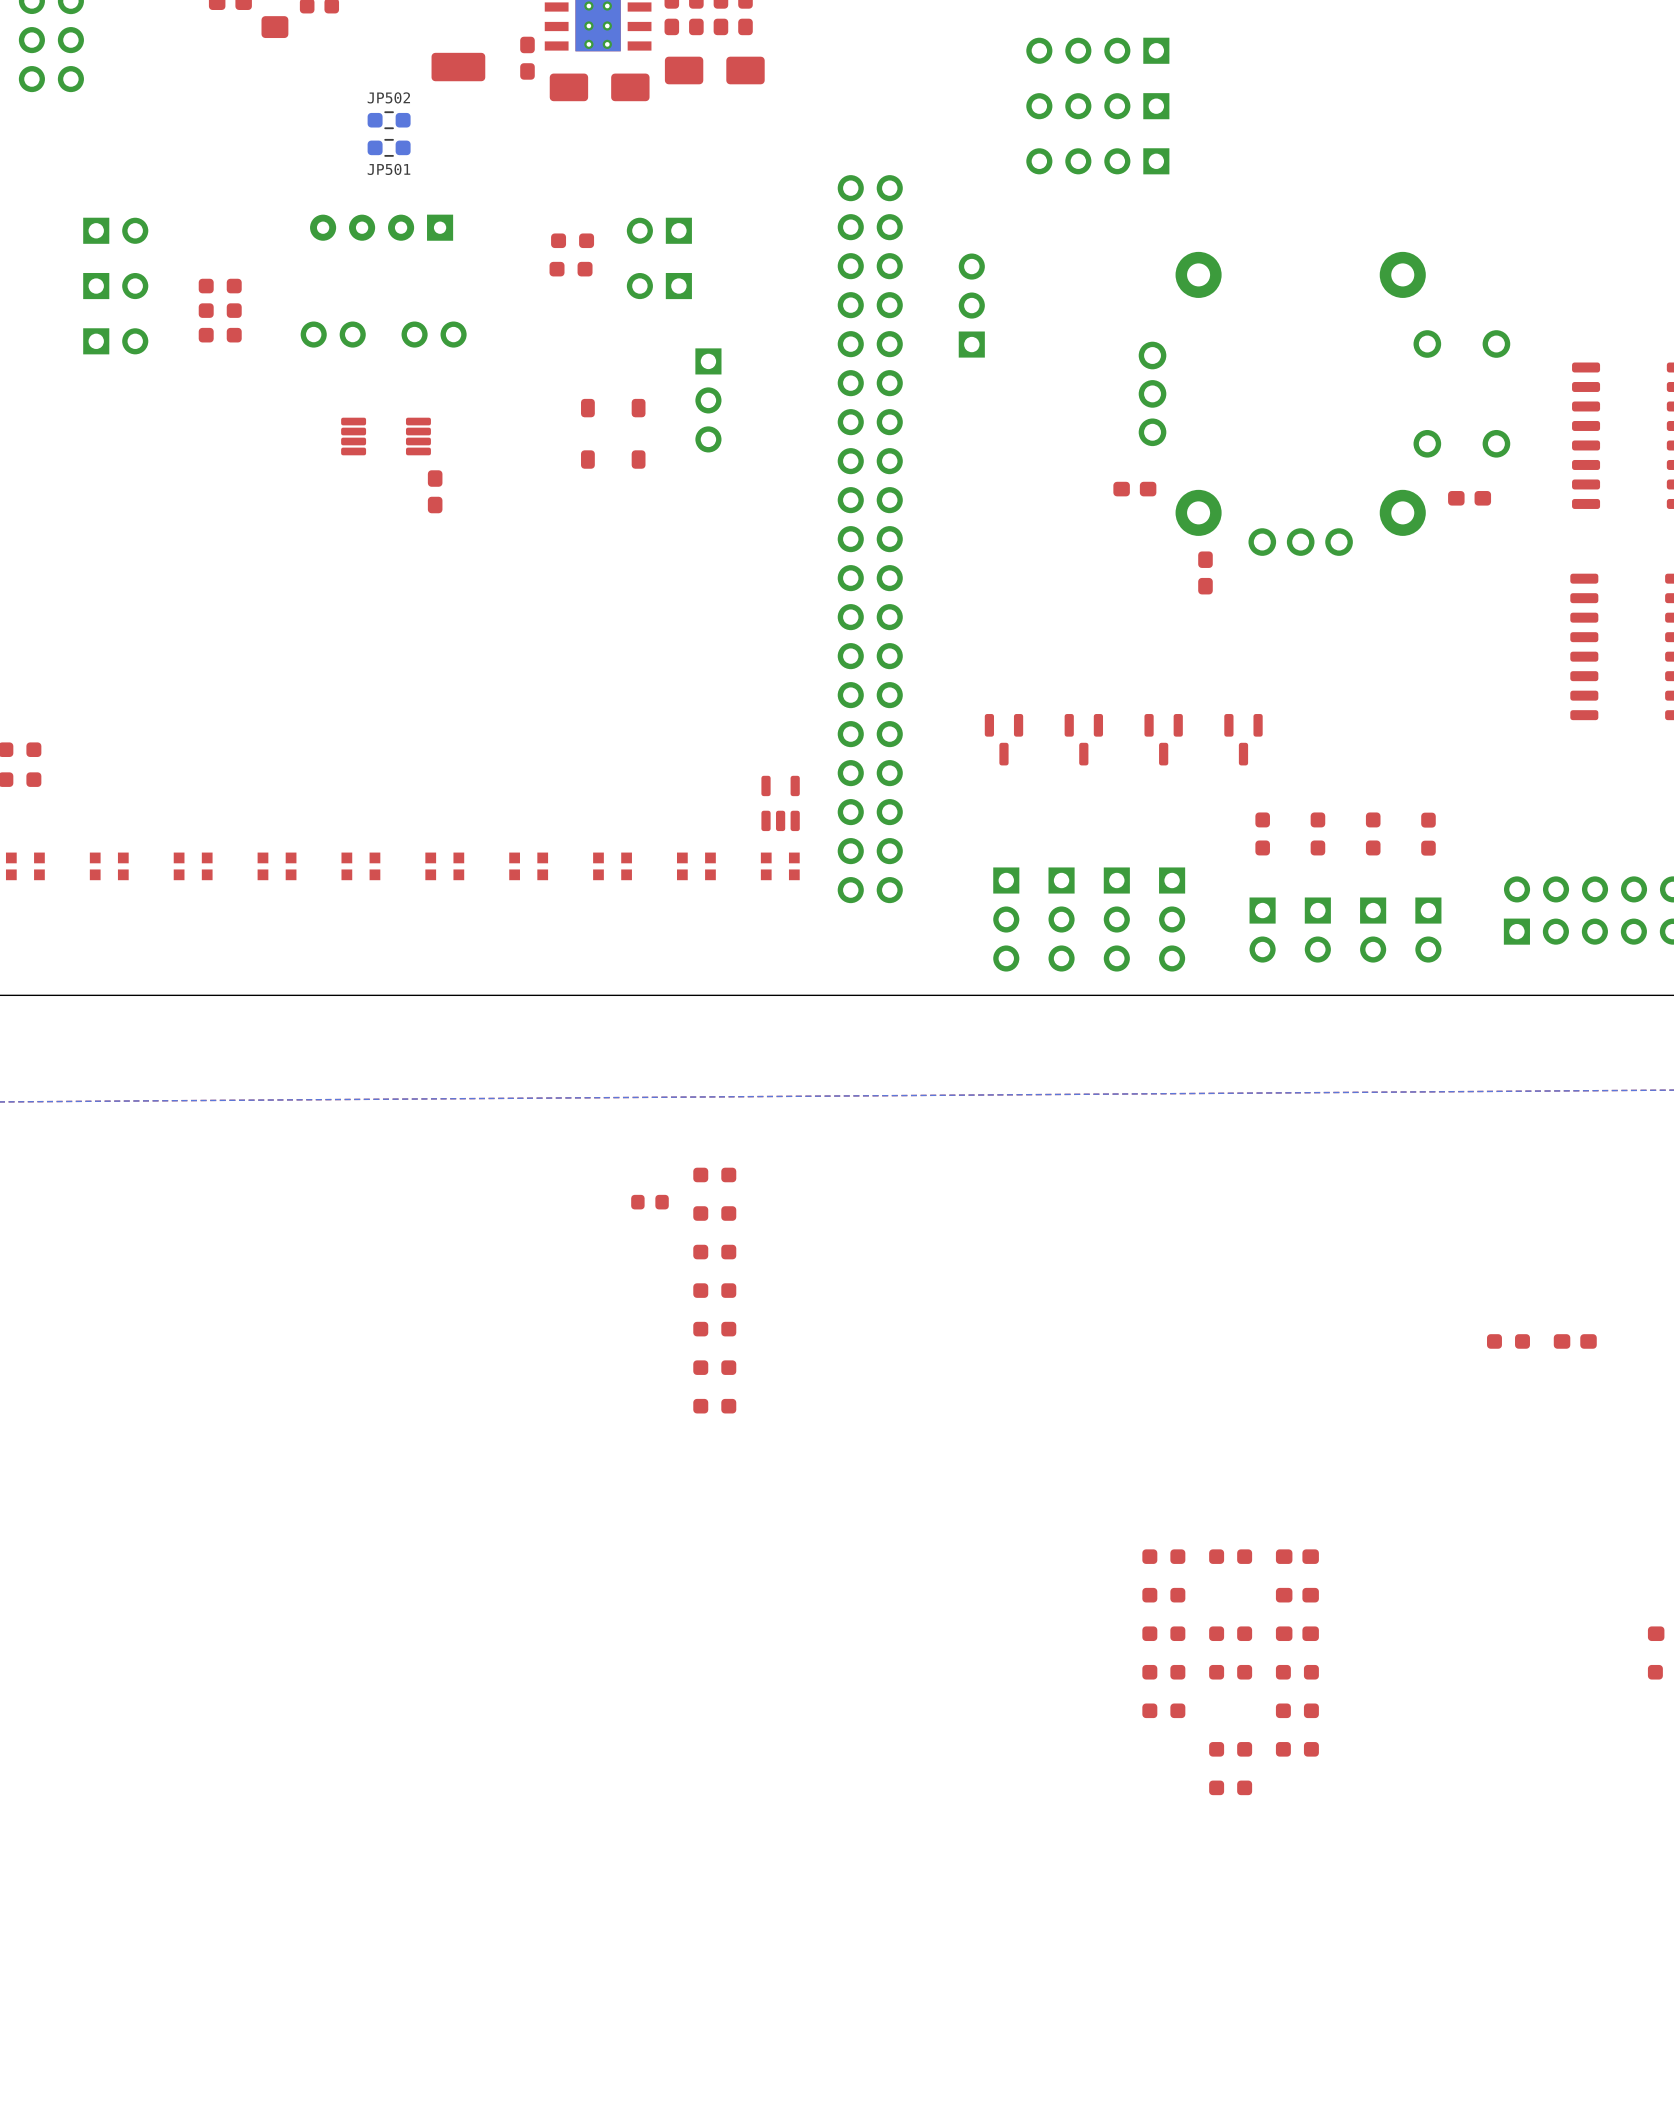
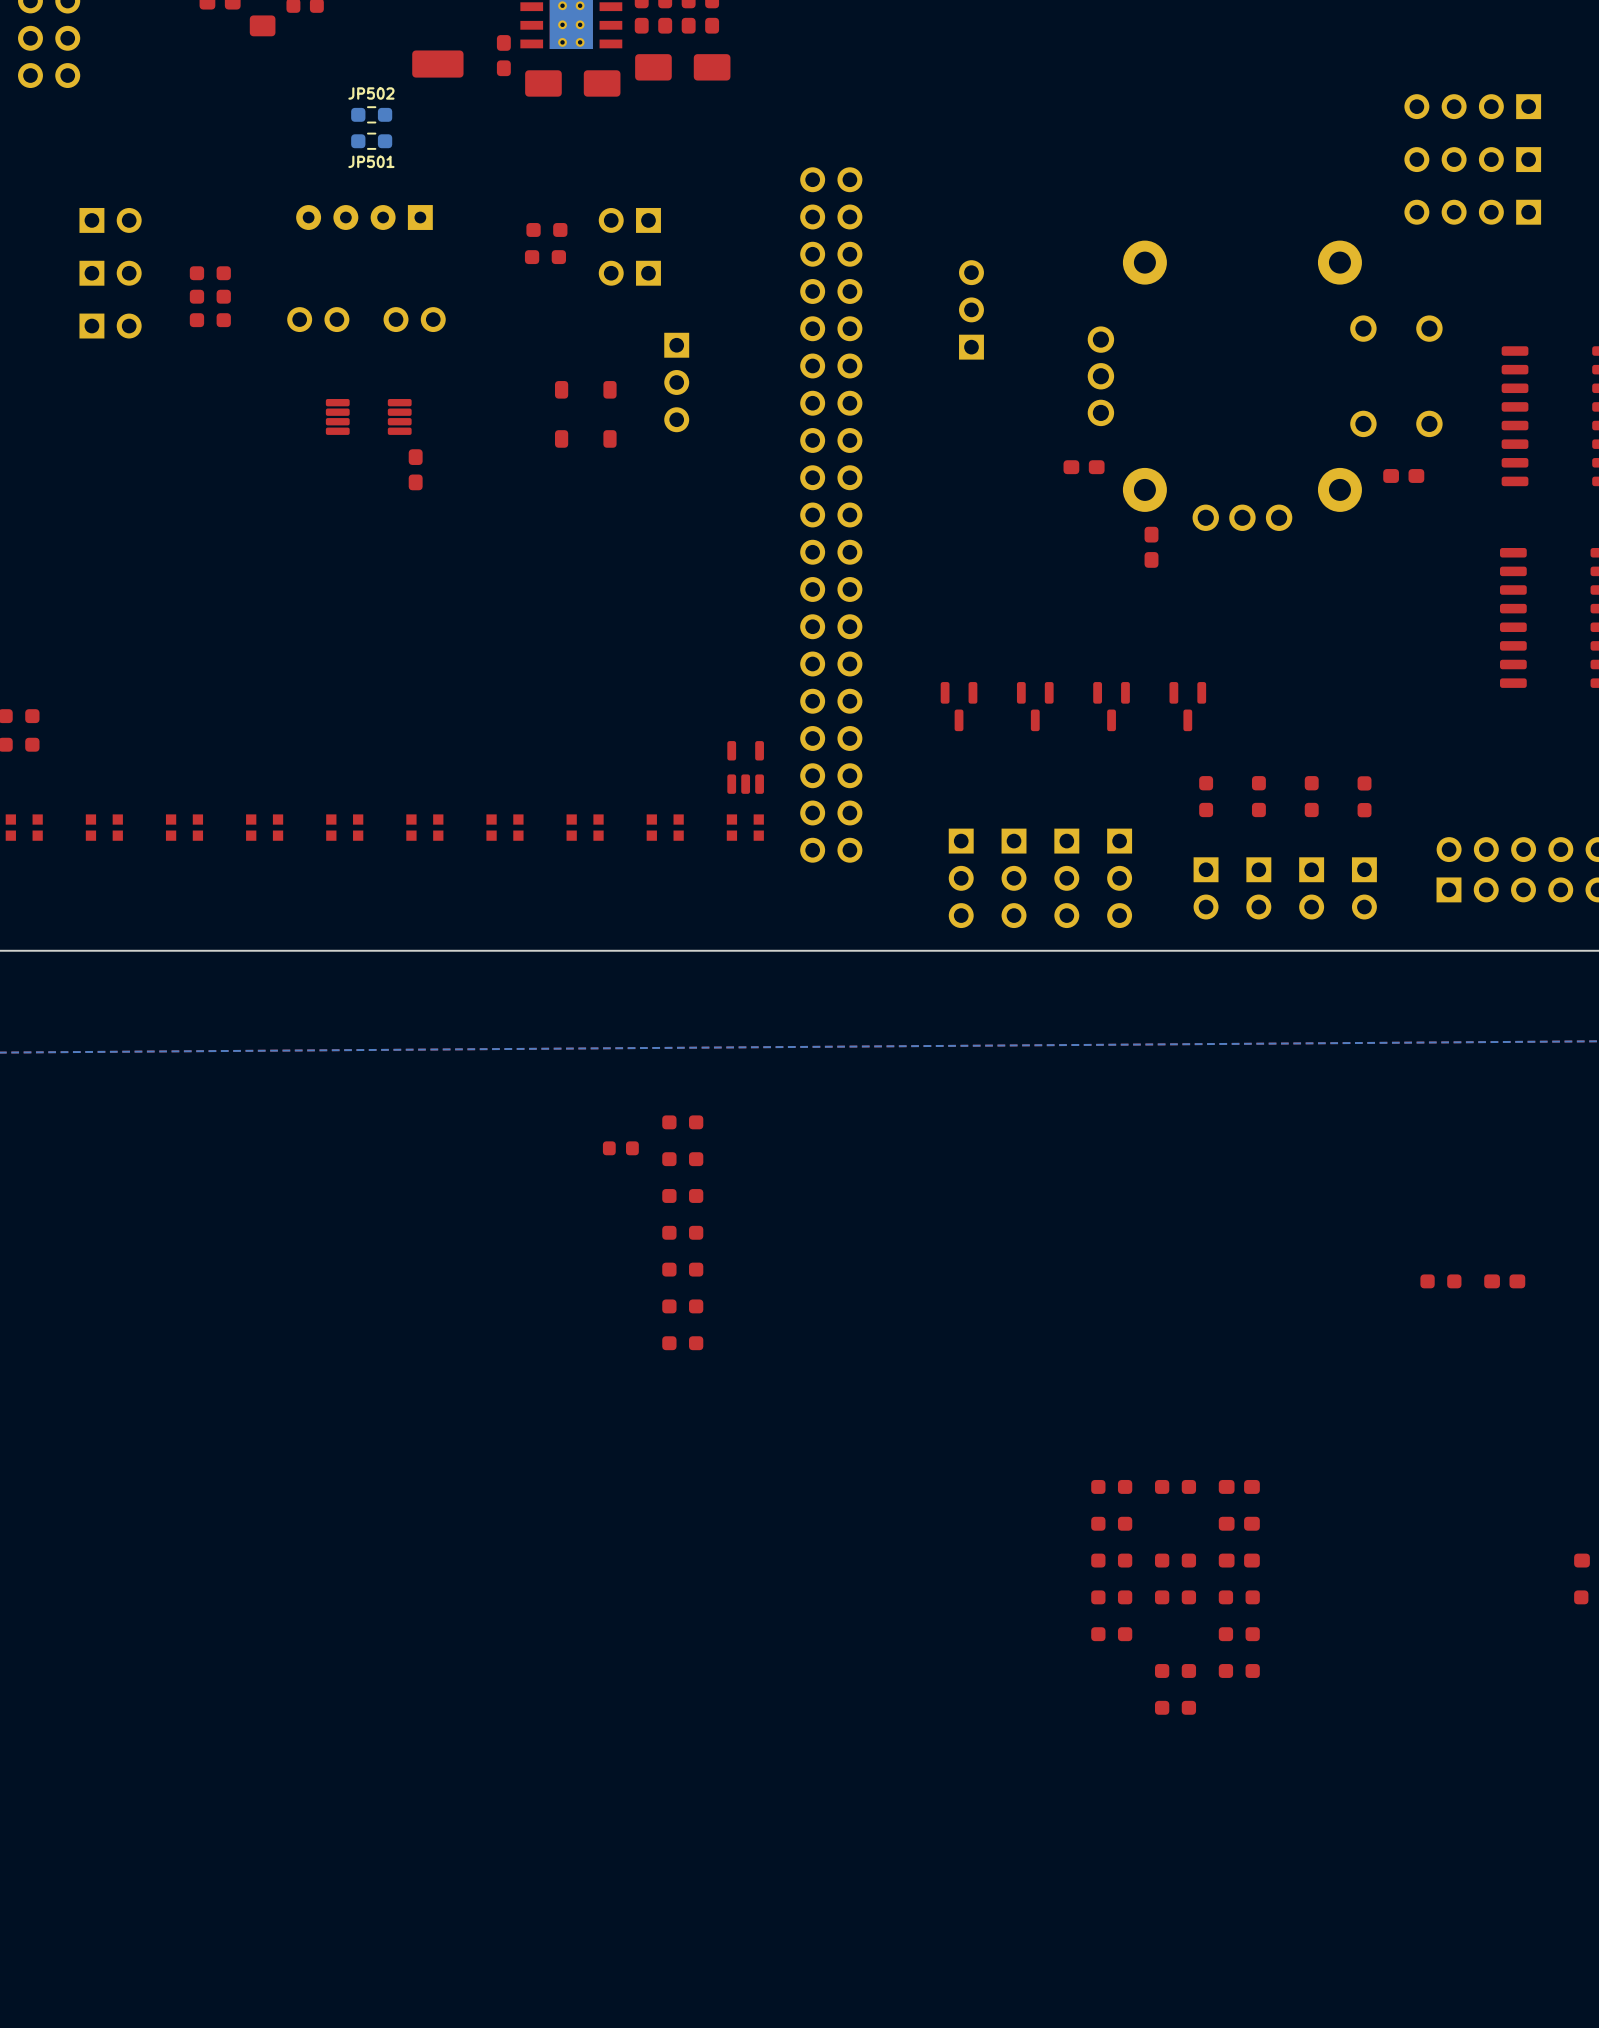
part: (1097, 50) -> none
part: (1097, 106) -> none
part: none -> (1472, 106)
part: (1097, 161) -> none
part: none -> (1472, 159)
part: none -> (1472, 212)
part position: (971, 305) -> (971, 309)

